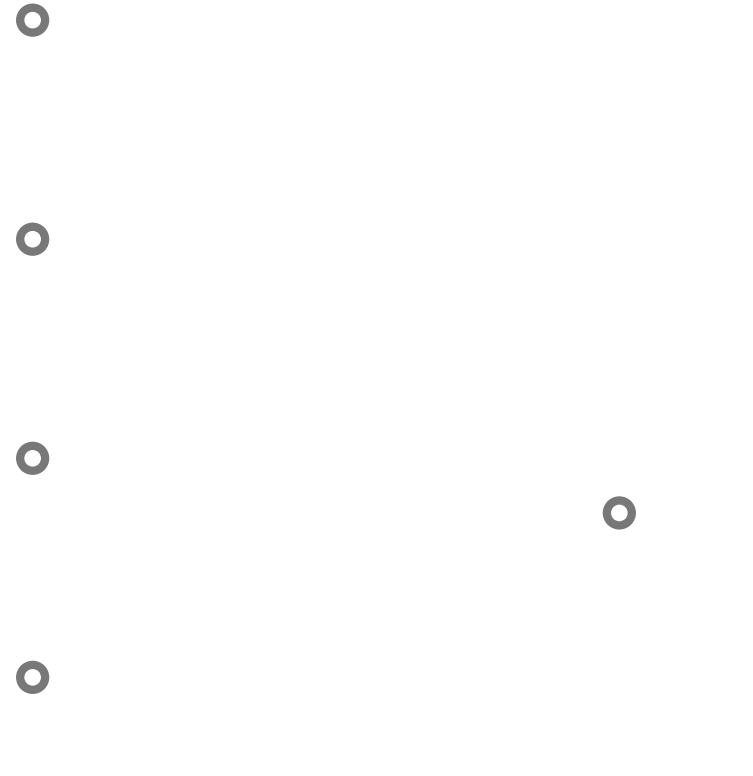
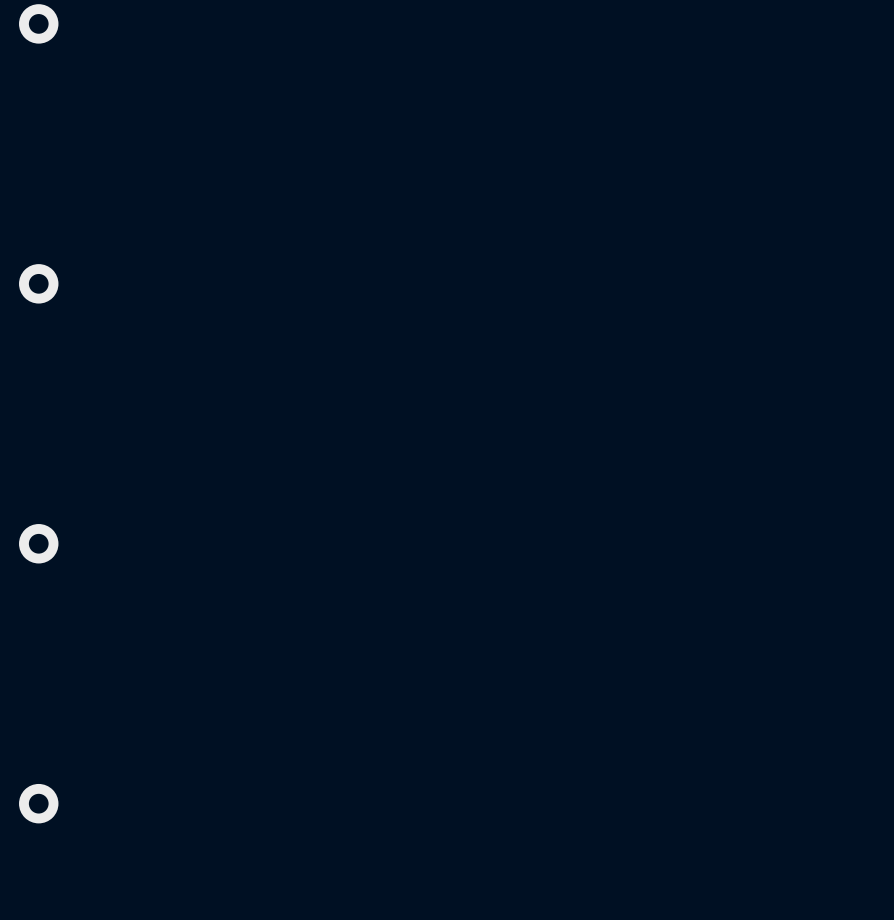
via: (619, 512) -> none

